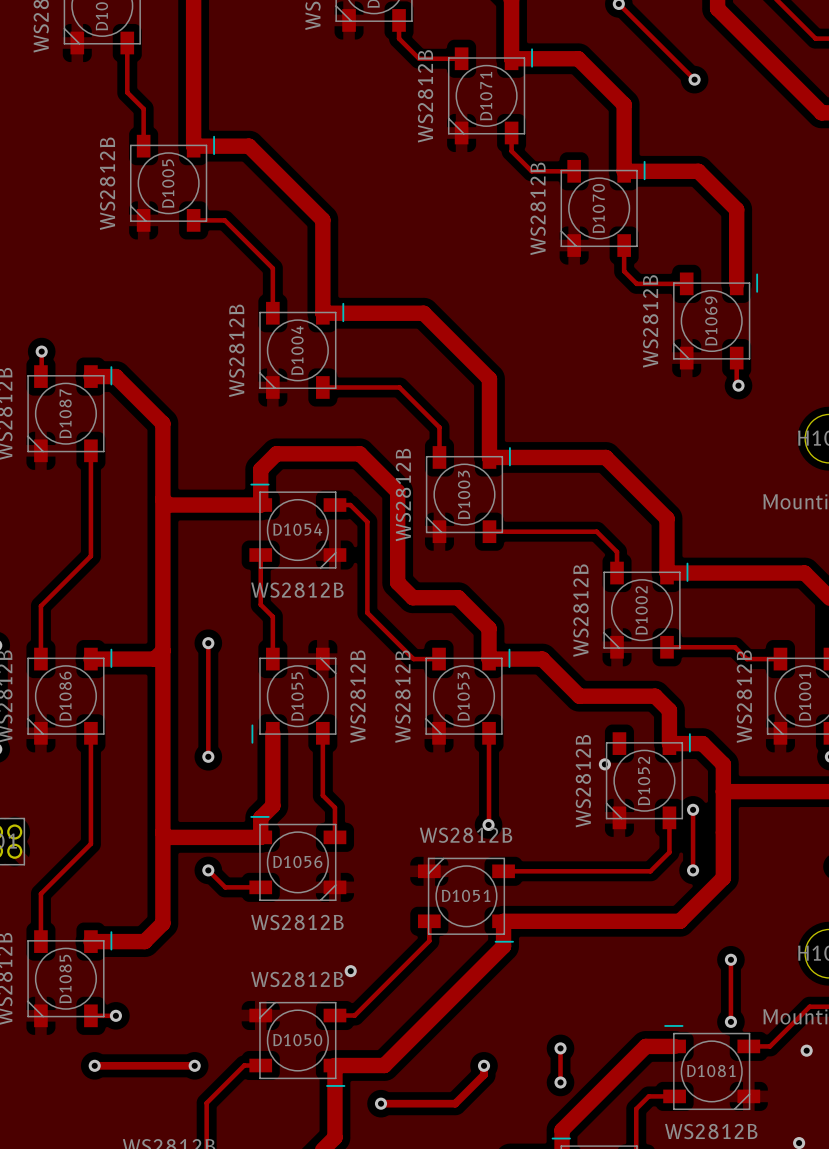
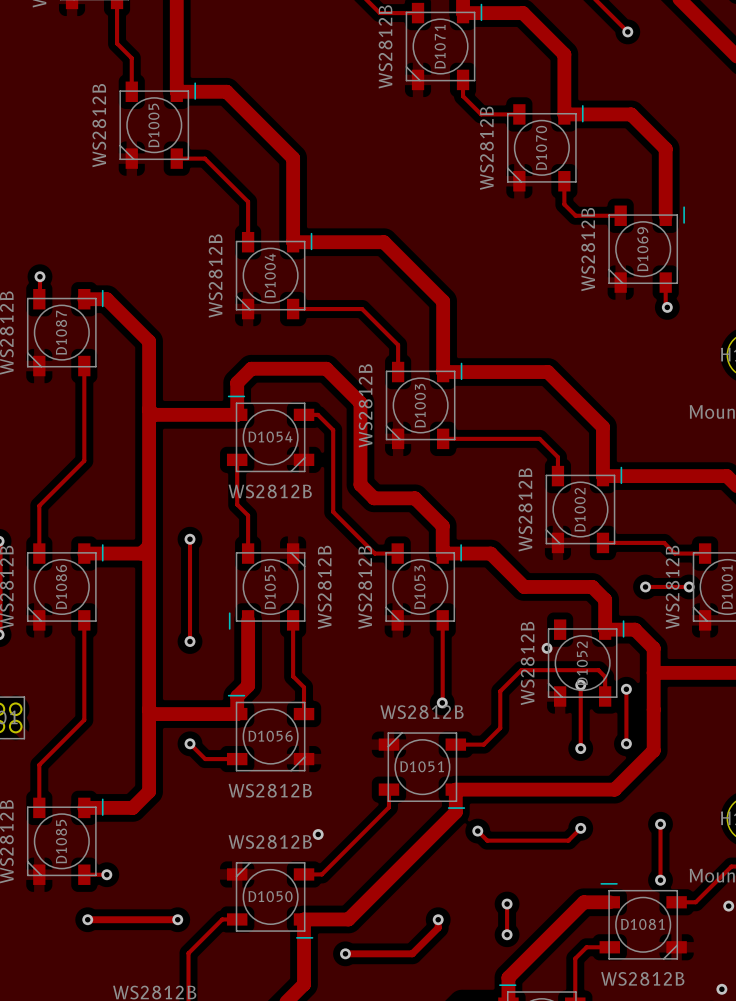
track: none -> (645, 586) (689, 586)
via: none -> (645, 586)
via: none -> (689, 586)
track: none -> (580, 685) (580, 748)
via: none -> (580, 685)
track: (669, 817) (669, 852) (650, 871) (534, 871) -> (605, 696) (605, 676) (598, 670) (521, 670) (500, 691) (500, 728) (483, 744)
via: none -> (580, 748)
track: none -> (580, 828) (568, 840) (487, 840) (477, 831)
via: none -> (580, 828)
via: none -> (477, 831)

